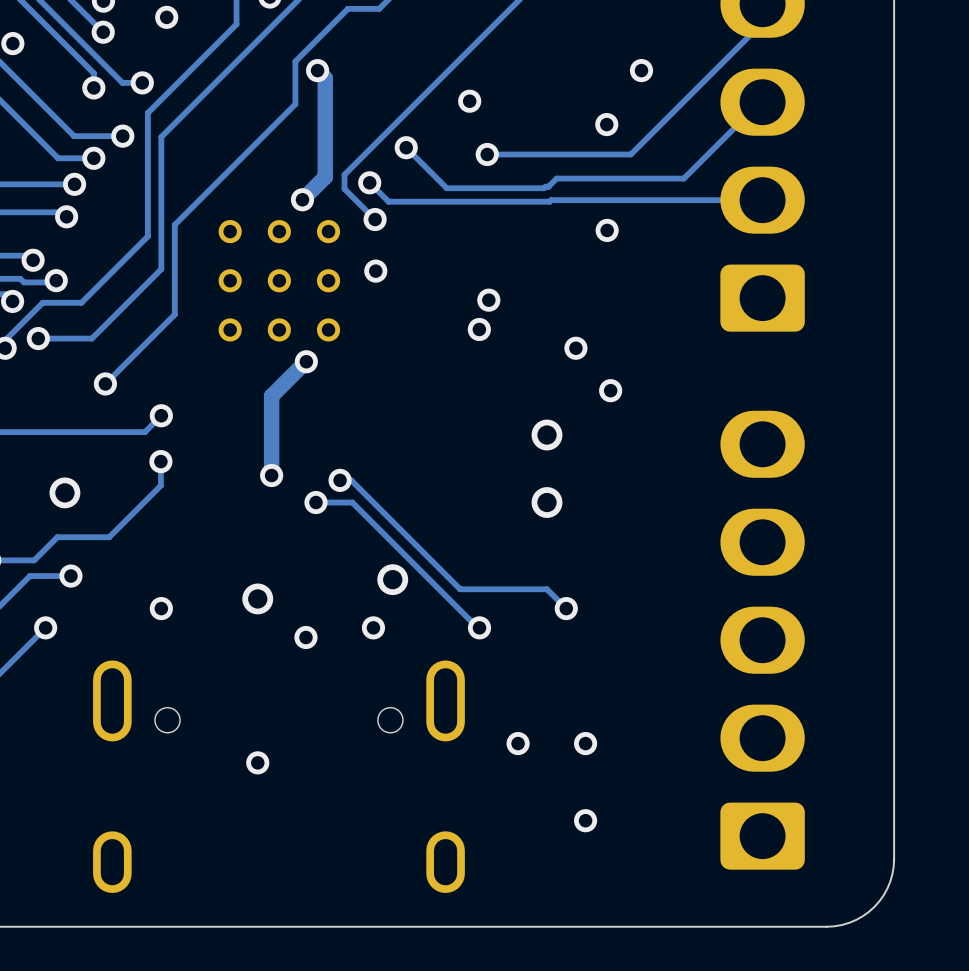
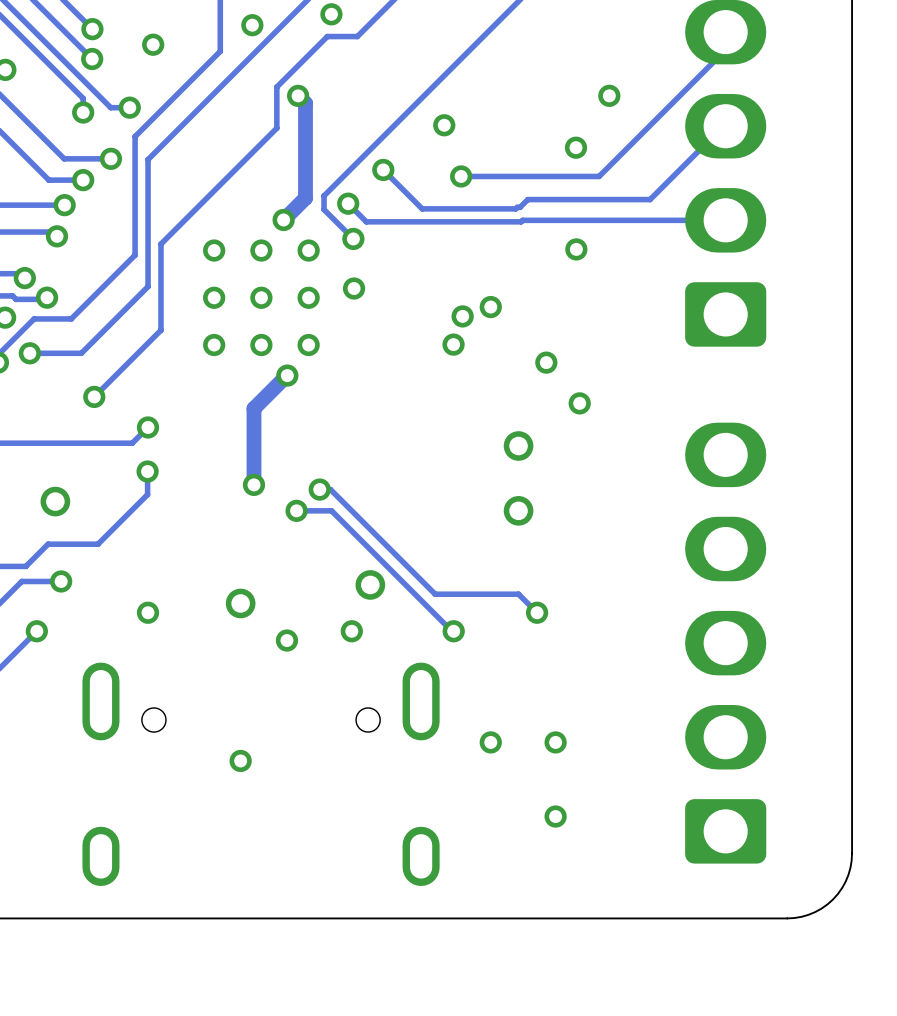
via: none -> (490, 307)

